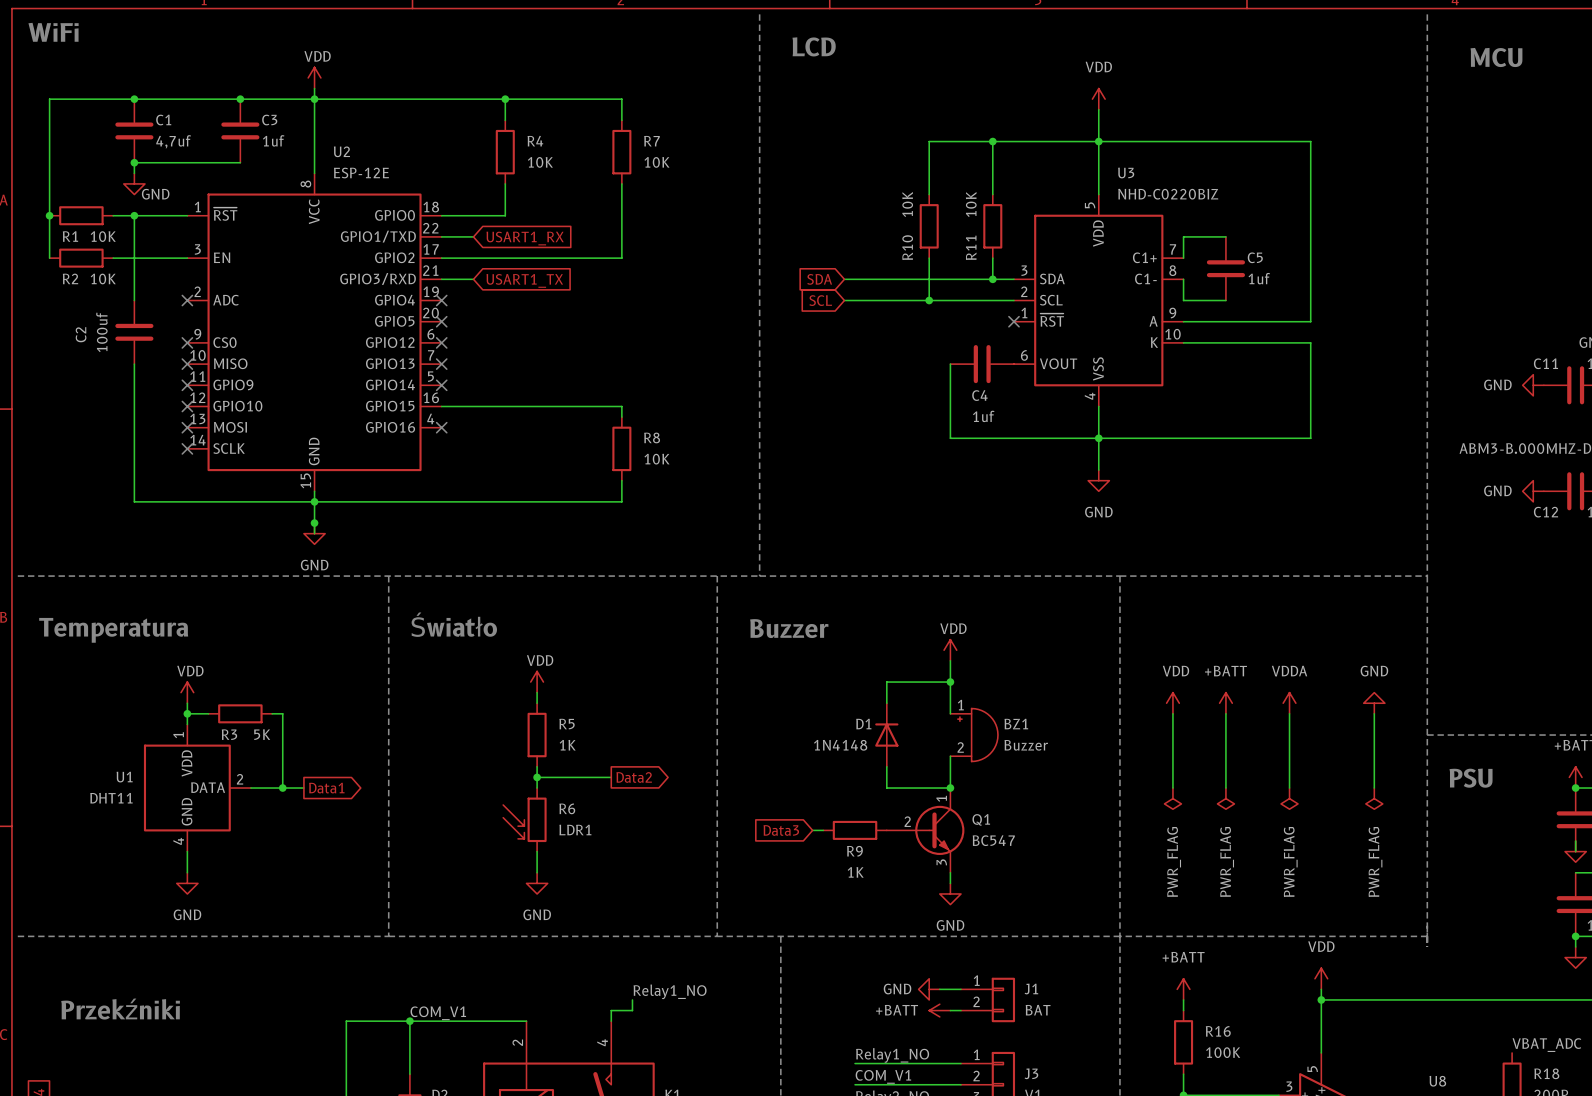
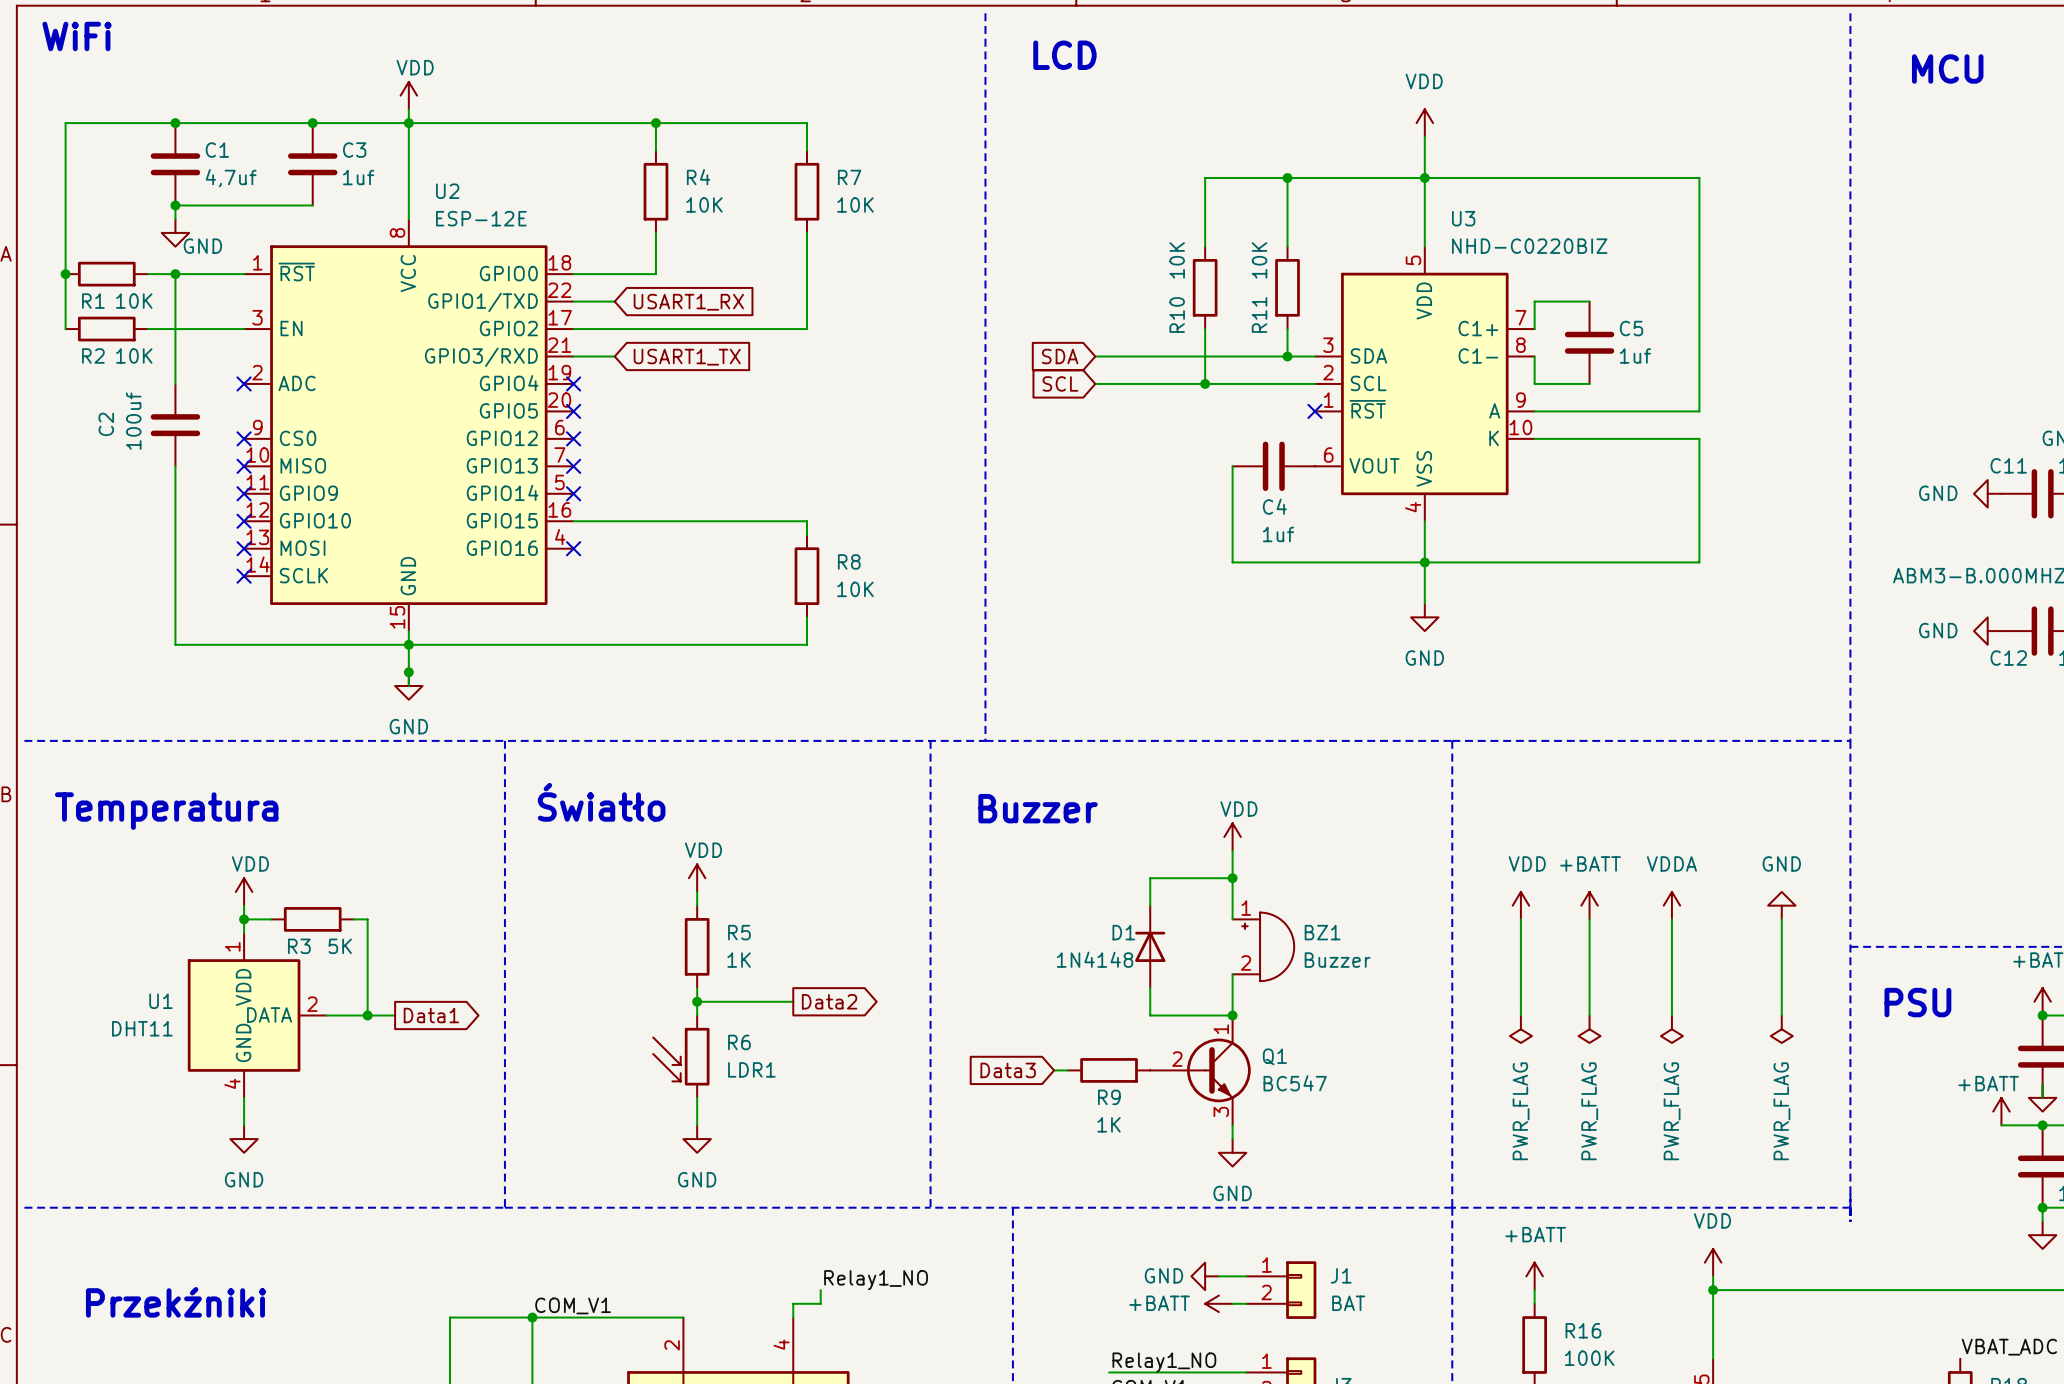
power symbol: none -> +BATT (2001, 1111)
wire: none -> (2001, 1125) (2042, 1125)
junction: none -> (2042, 1125)

